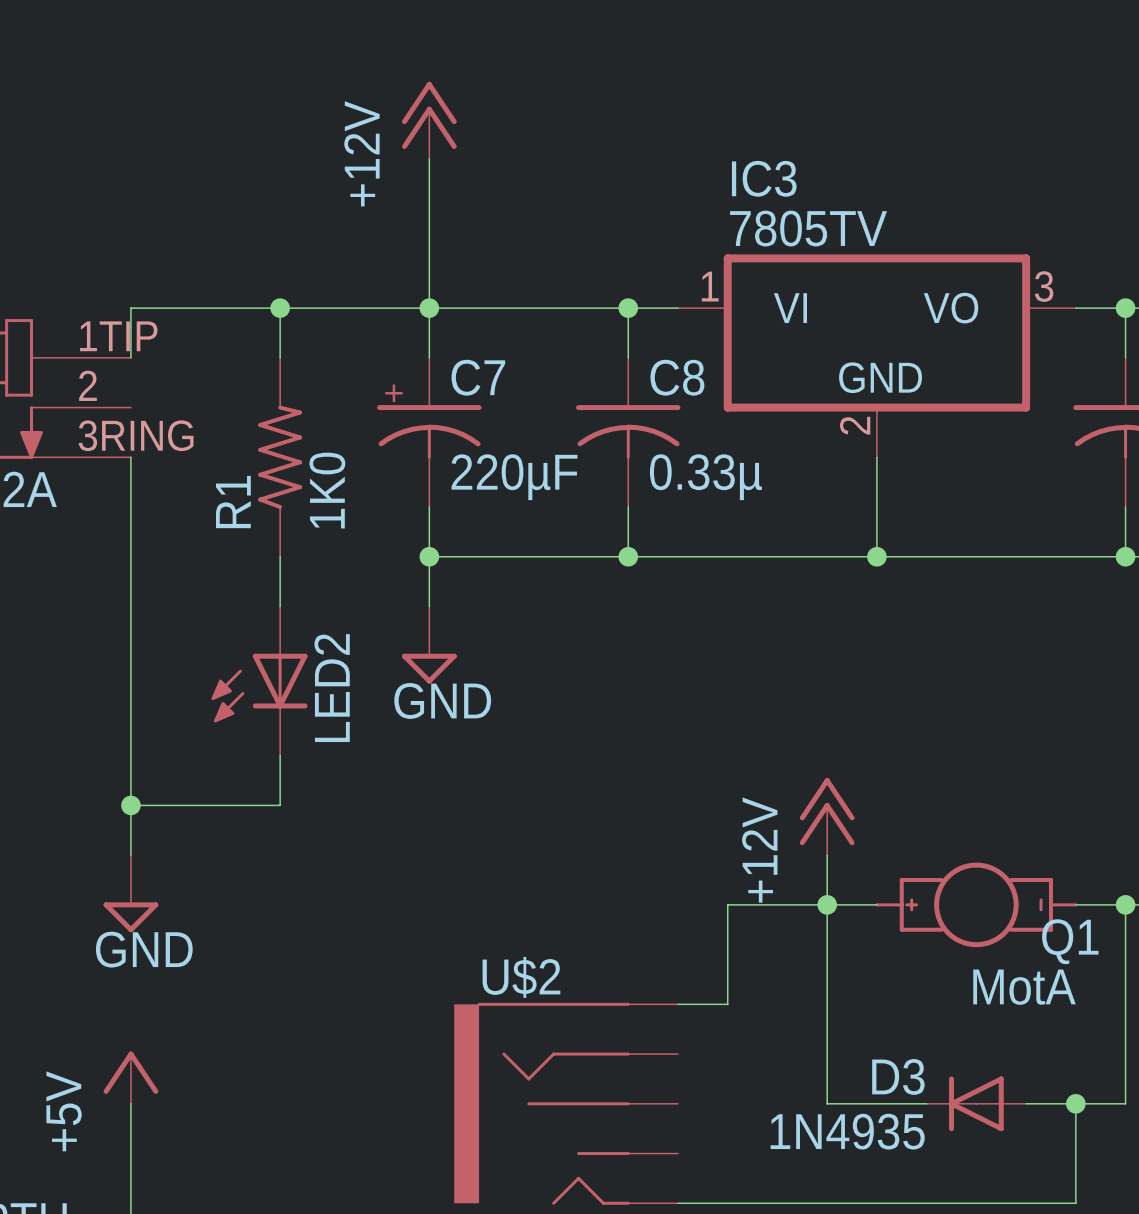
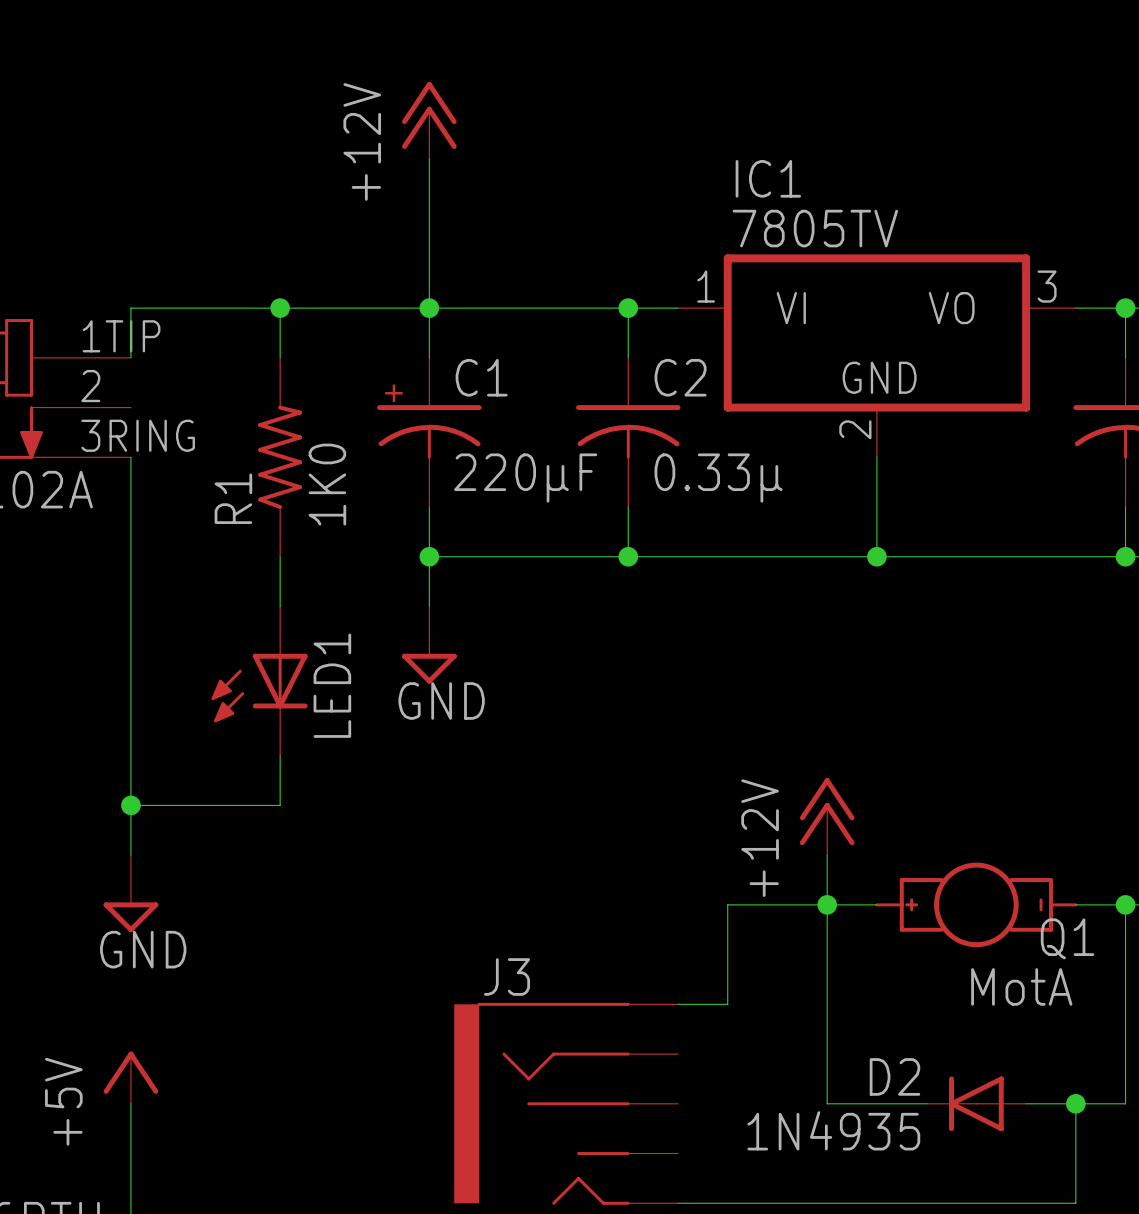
IC3 name: IC3 (764, 178) -> IC1 (768, 178)
C7 name: C7 (478, 377) -> C1 (481, 377)
C8 name: C8 (677, 377) -> C2 (680, 377)
LED2 name: LED2 (332, 688) -> LED1 (332, 685)
U$2 name: U$2 (521, 977) -> J3 (507, 976)
D3 name: D3 (898, 1076) -> D2 (894, 1076)

